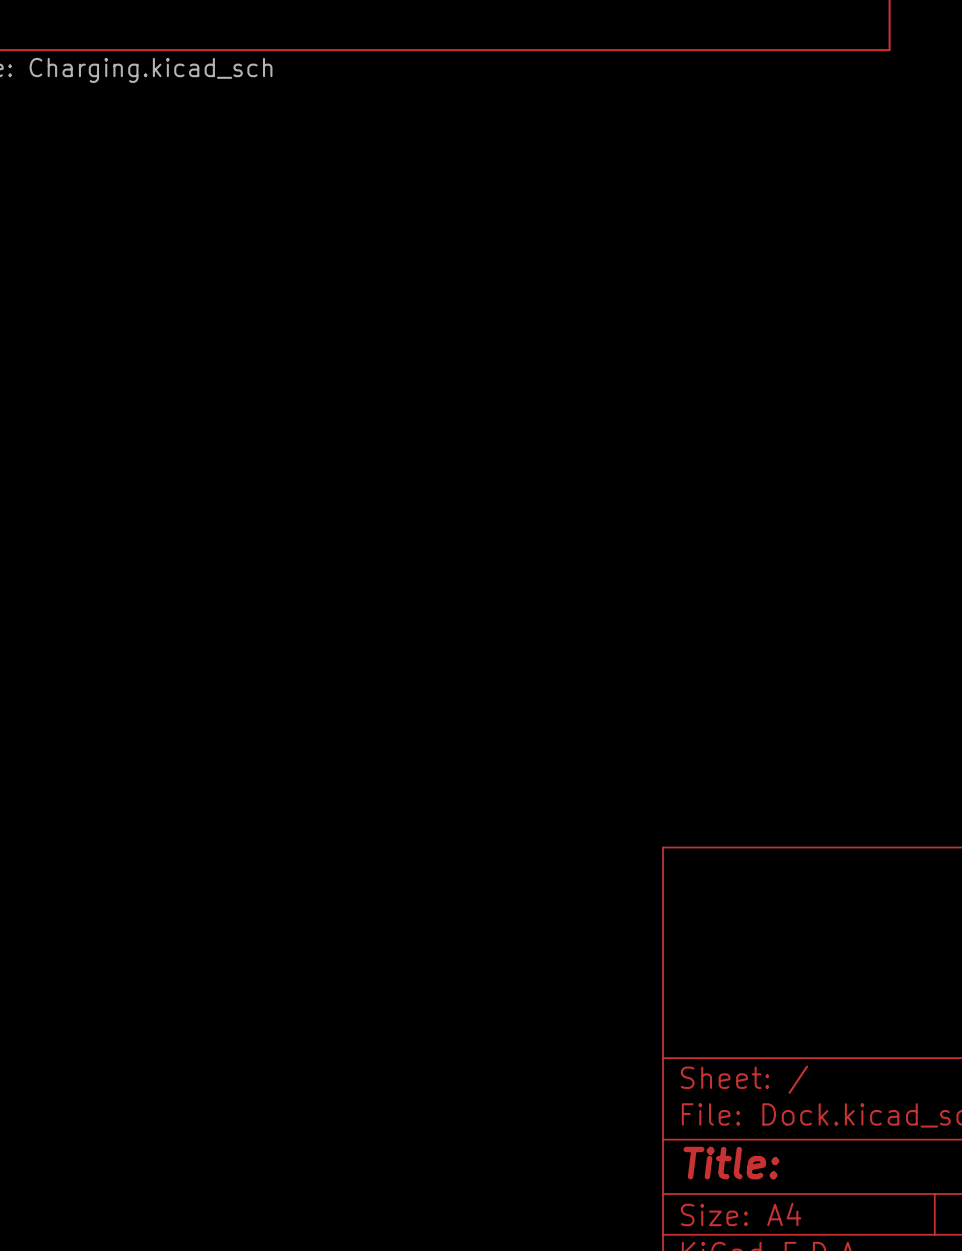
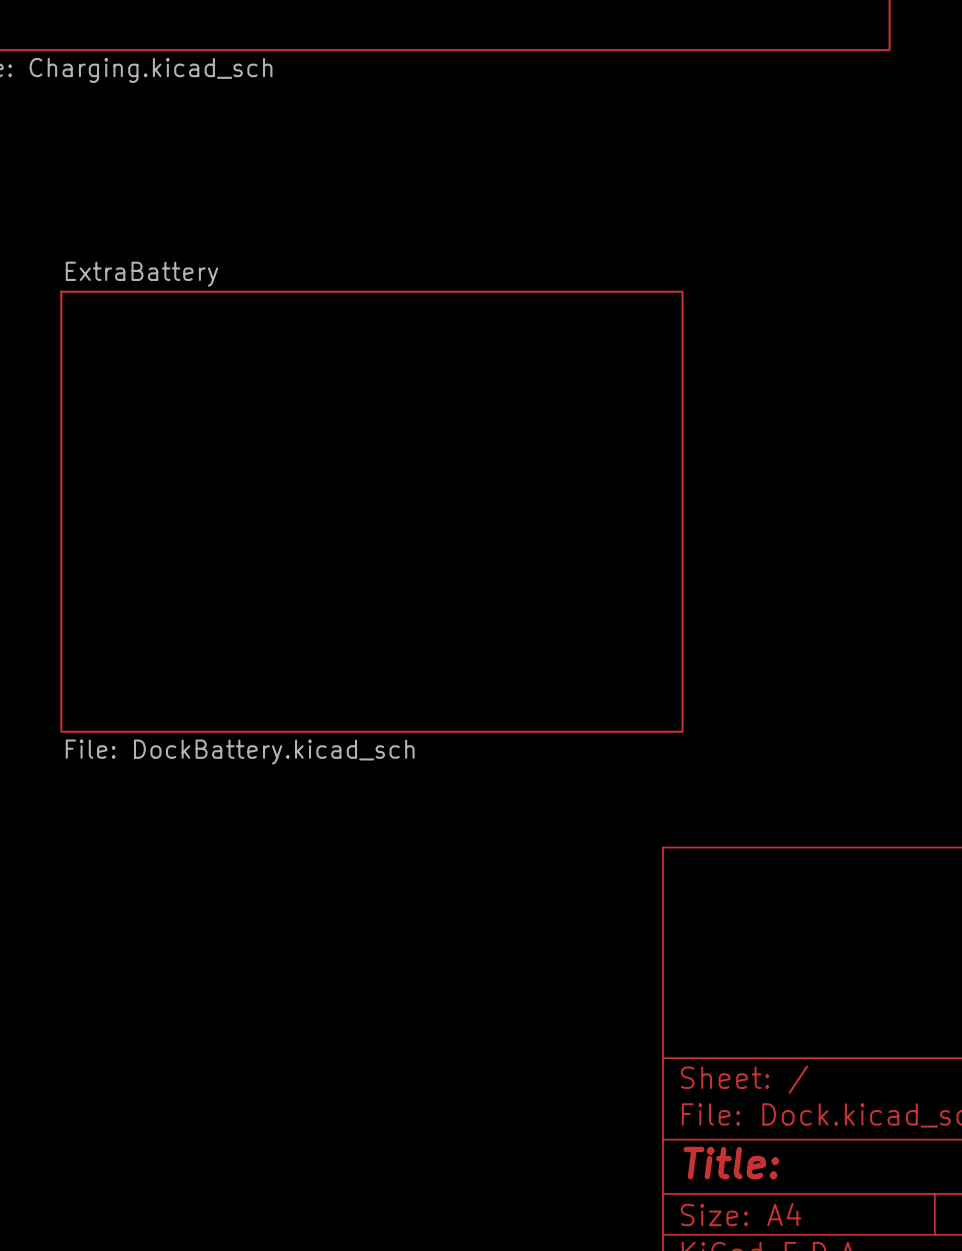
sheet ExtraBattery: none -> File: DockBattery.kicad_sch (371, 511)

